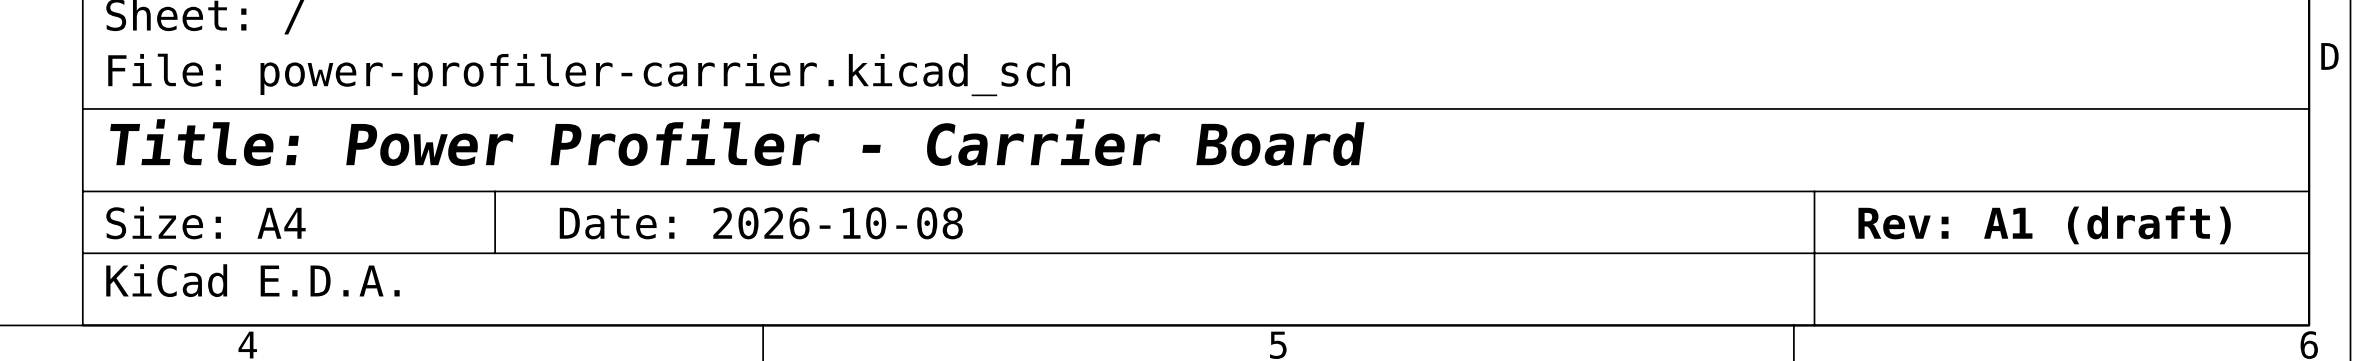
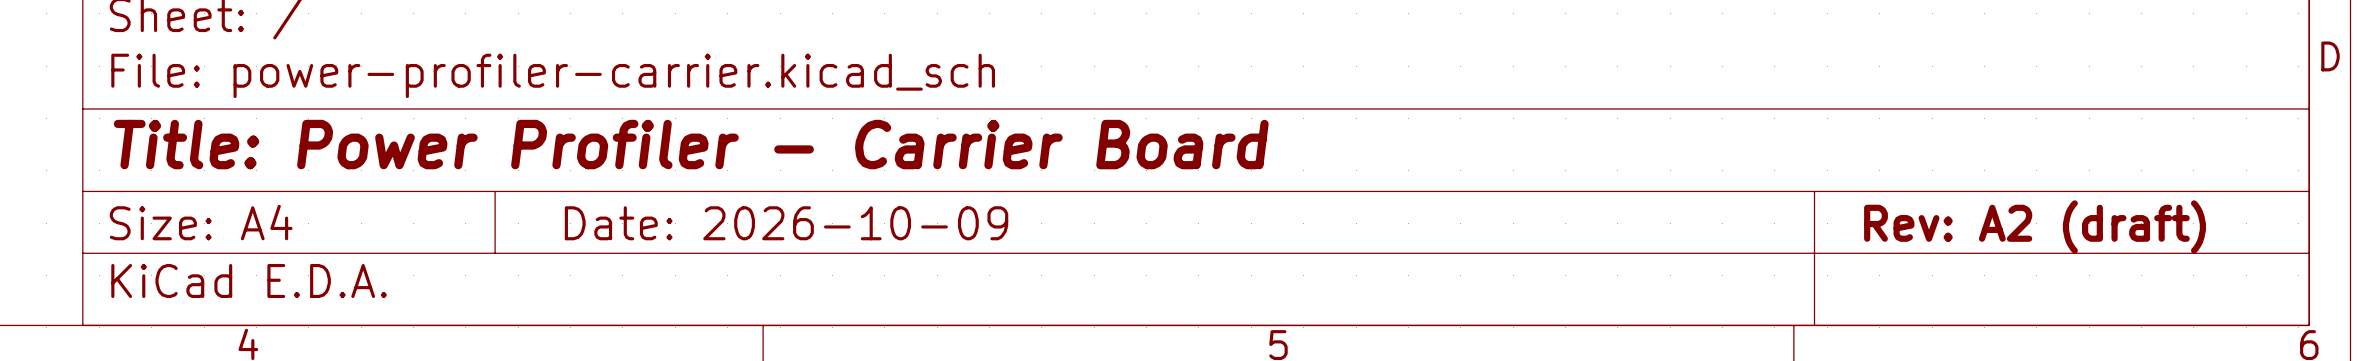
title block: Date: 2026-10-08 (761, 223) -> Date: 2026-10-09 (786, 223)
title block: Rev: A1 (draft) (2044, 225) -> Rev: A2 (draft) (2035, 226)

